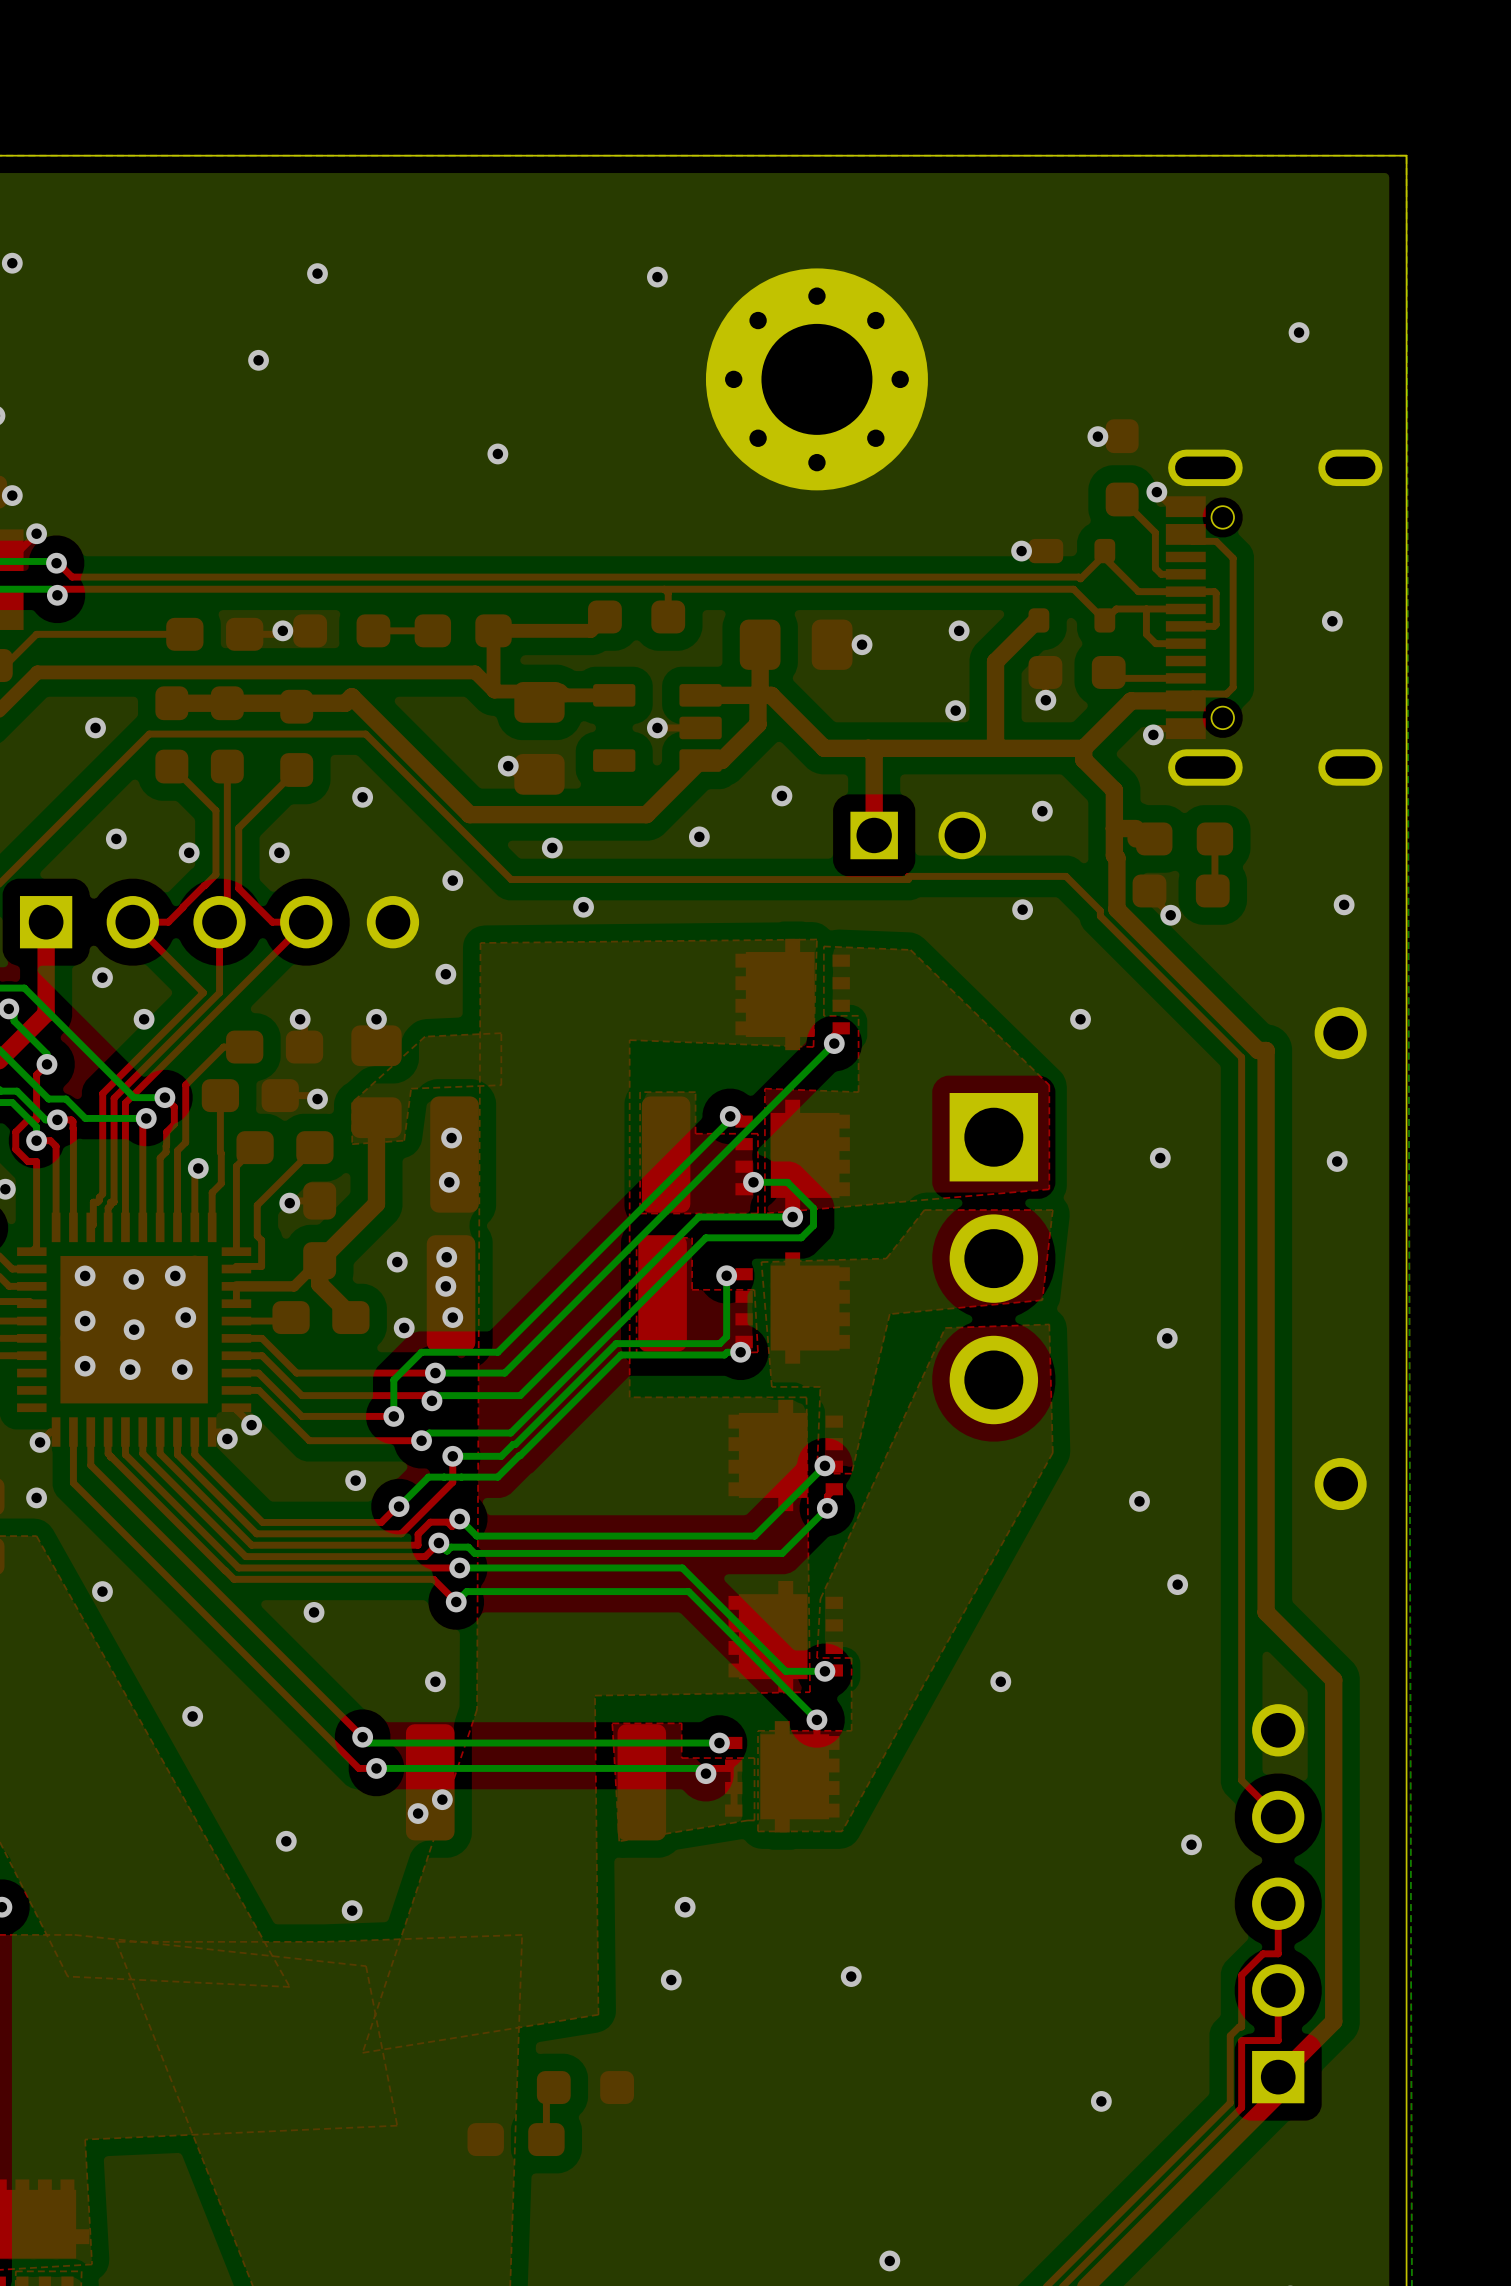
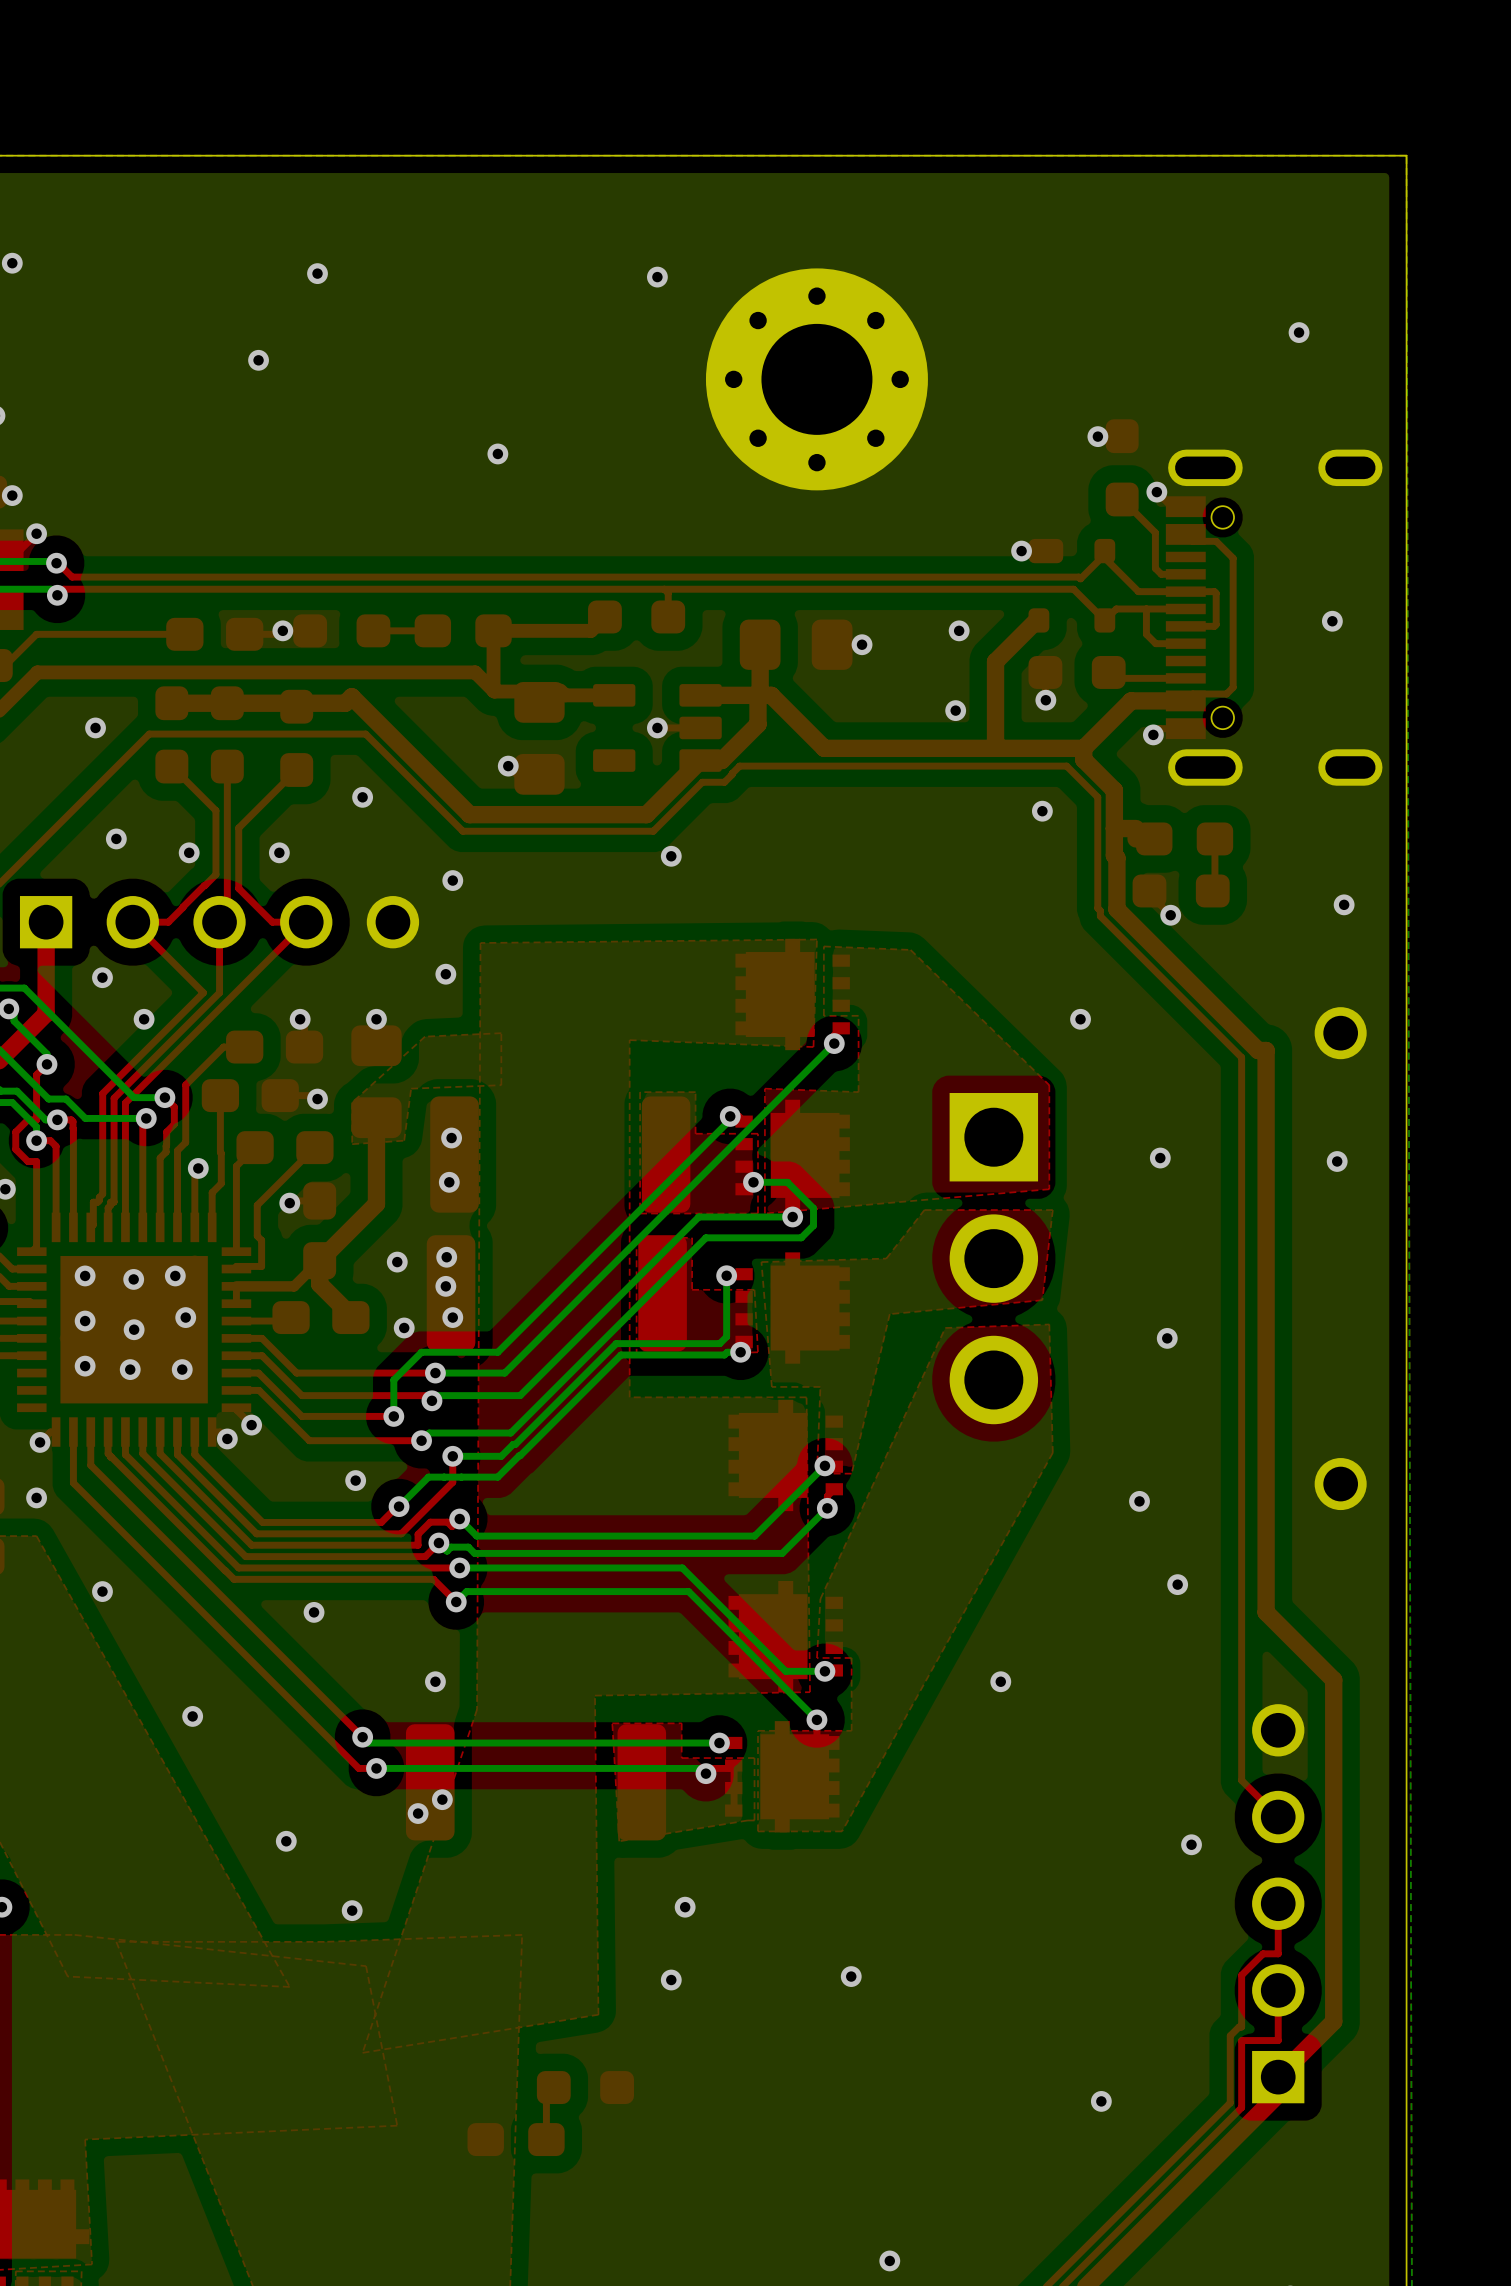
top track: (868, 748) (874, 754) (874, 835) -> none
via: (781, 795) -> none
top track: (462, 831) (511, 879) (908, 879) (908, 876) (1065, 876) (1097, 908) -> (462, 831) (653, 831) (702, 782) (724, 782) (739, 766) (1066, 766) (1097, 797) (1097, 908)
part: (918, 835) -> none
via position: (699, 836) -> (671, 856)
via: (552, 847) -> none
via: (583, 907) -> none
via: (1022, 909) -> none

